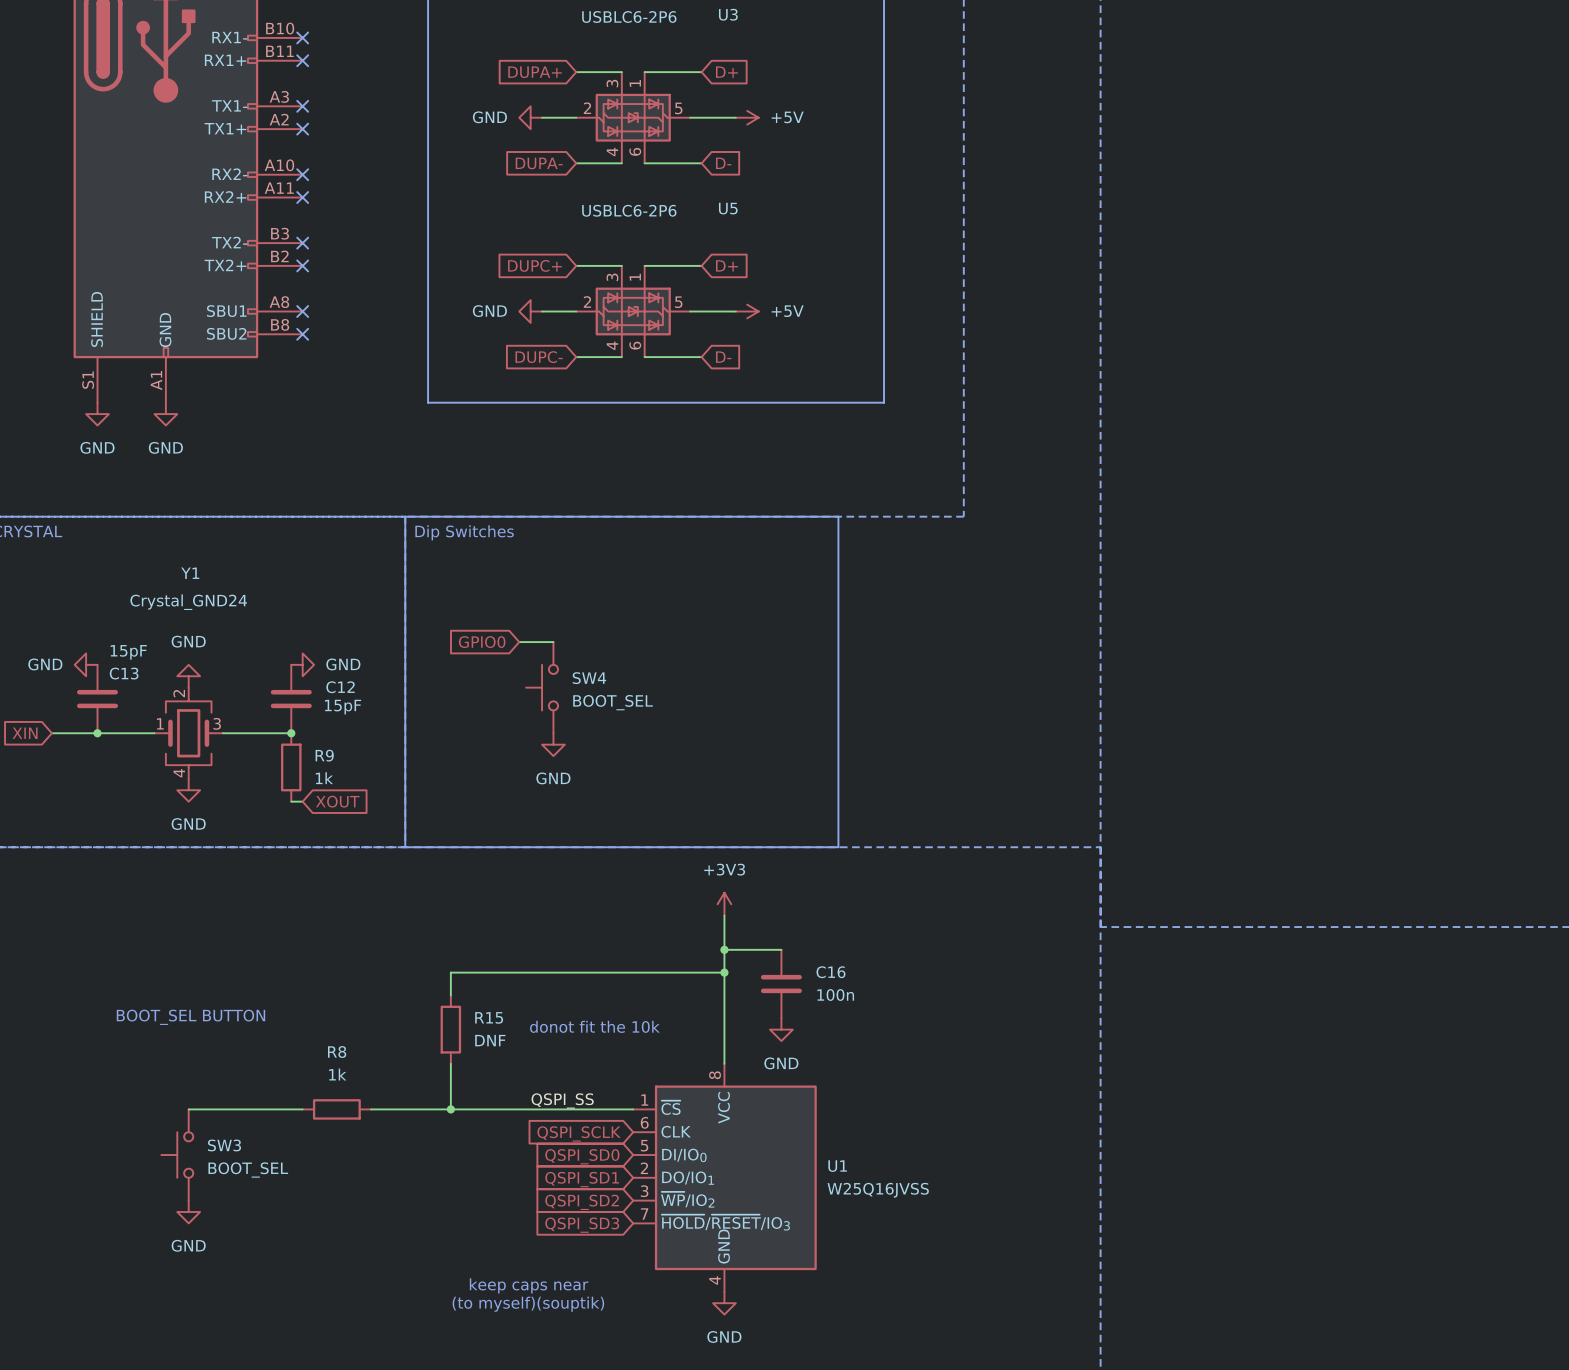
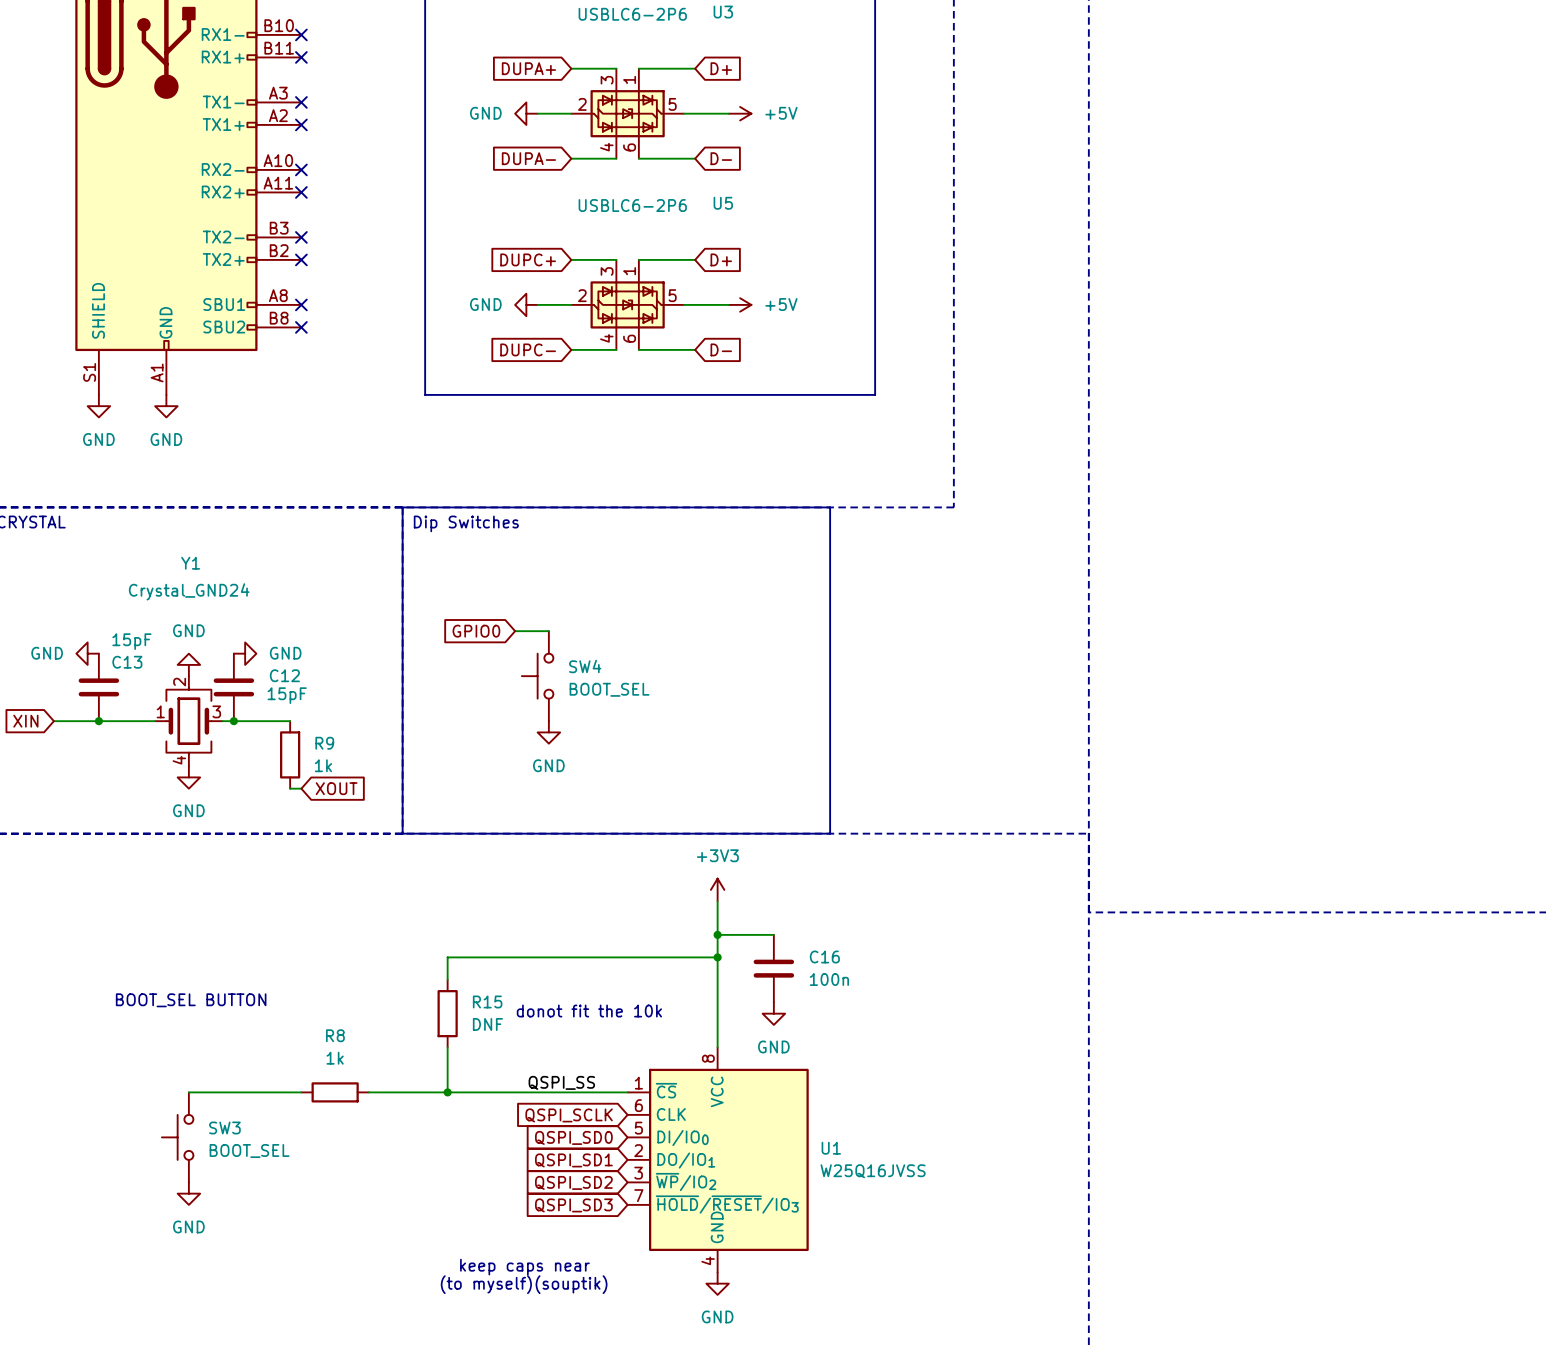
power symbol position: GND (302, 664) -> GND (245, 653)
C12 position: (291, 699) -> (233, 687)
junction: none -> (233, 721)
junction: (291, 733) -> none

